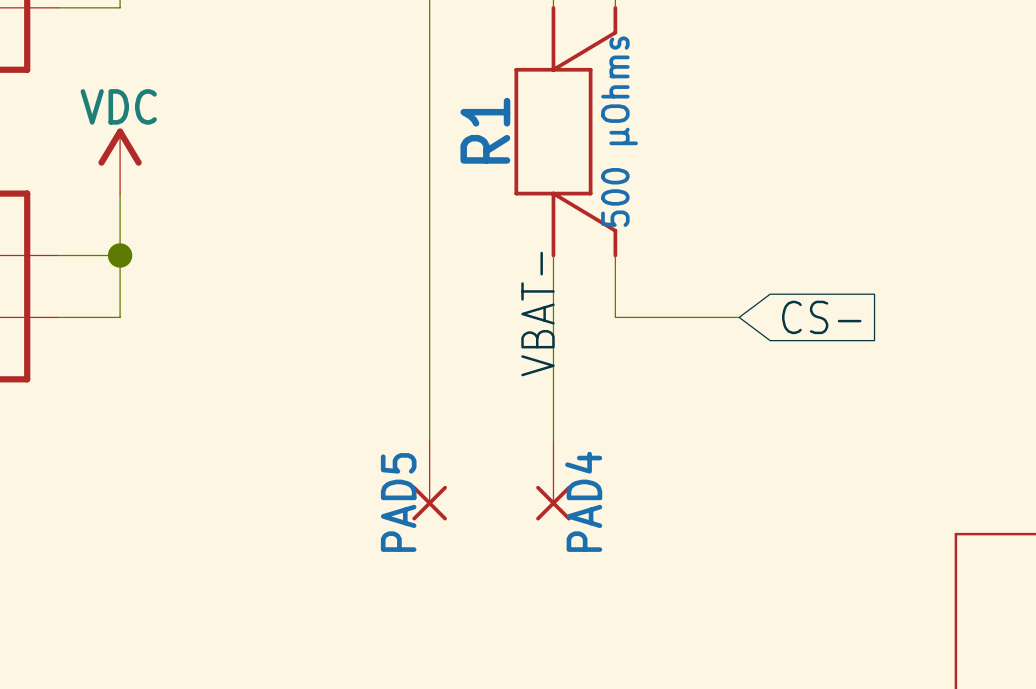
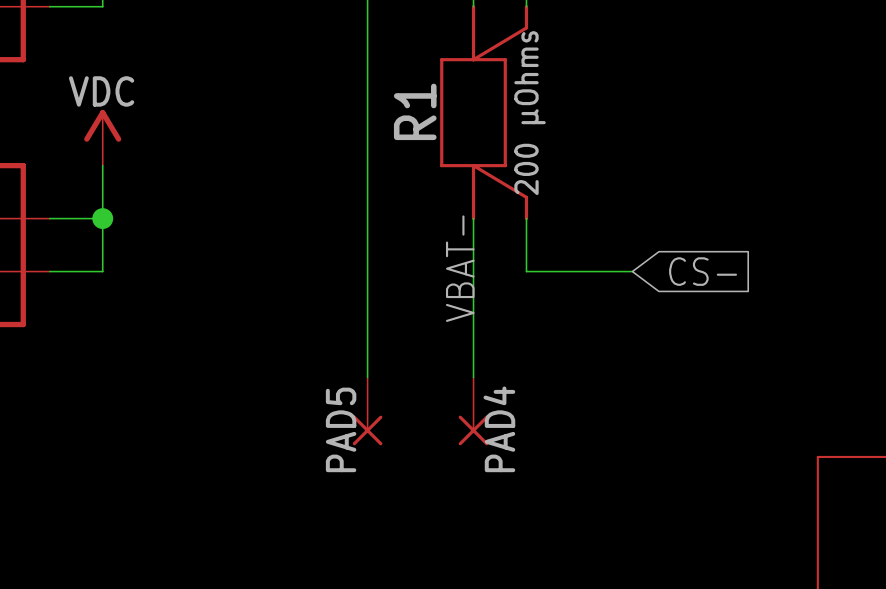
R1 value: 500 µOhms (619, 131) -> 200 µOhms (530, 113)

